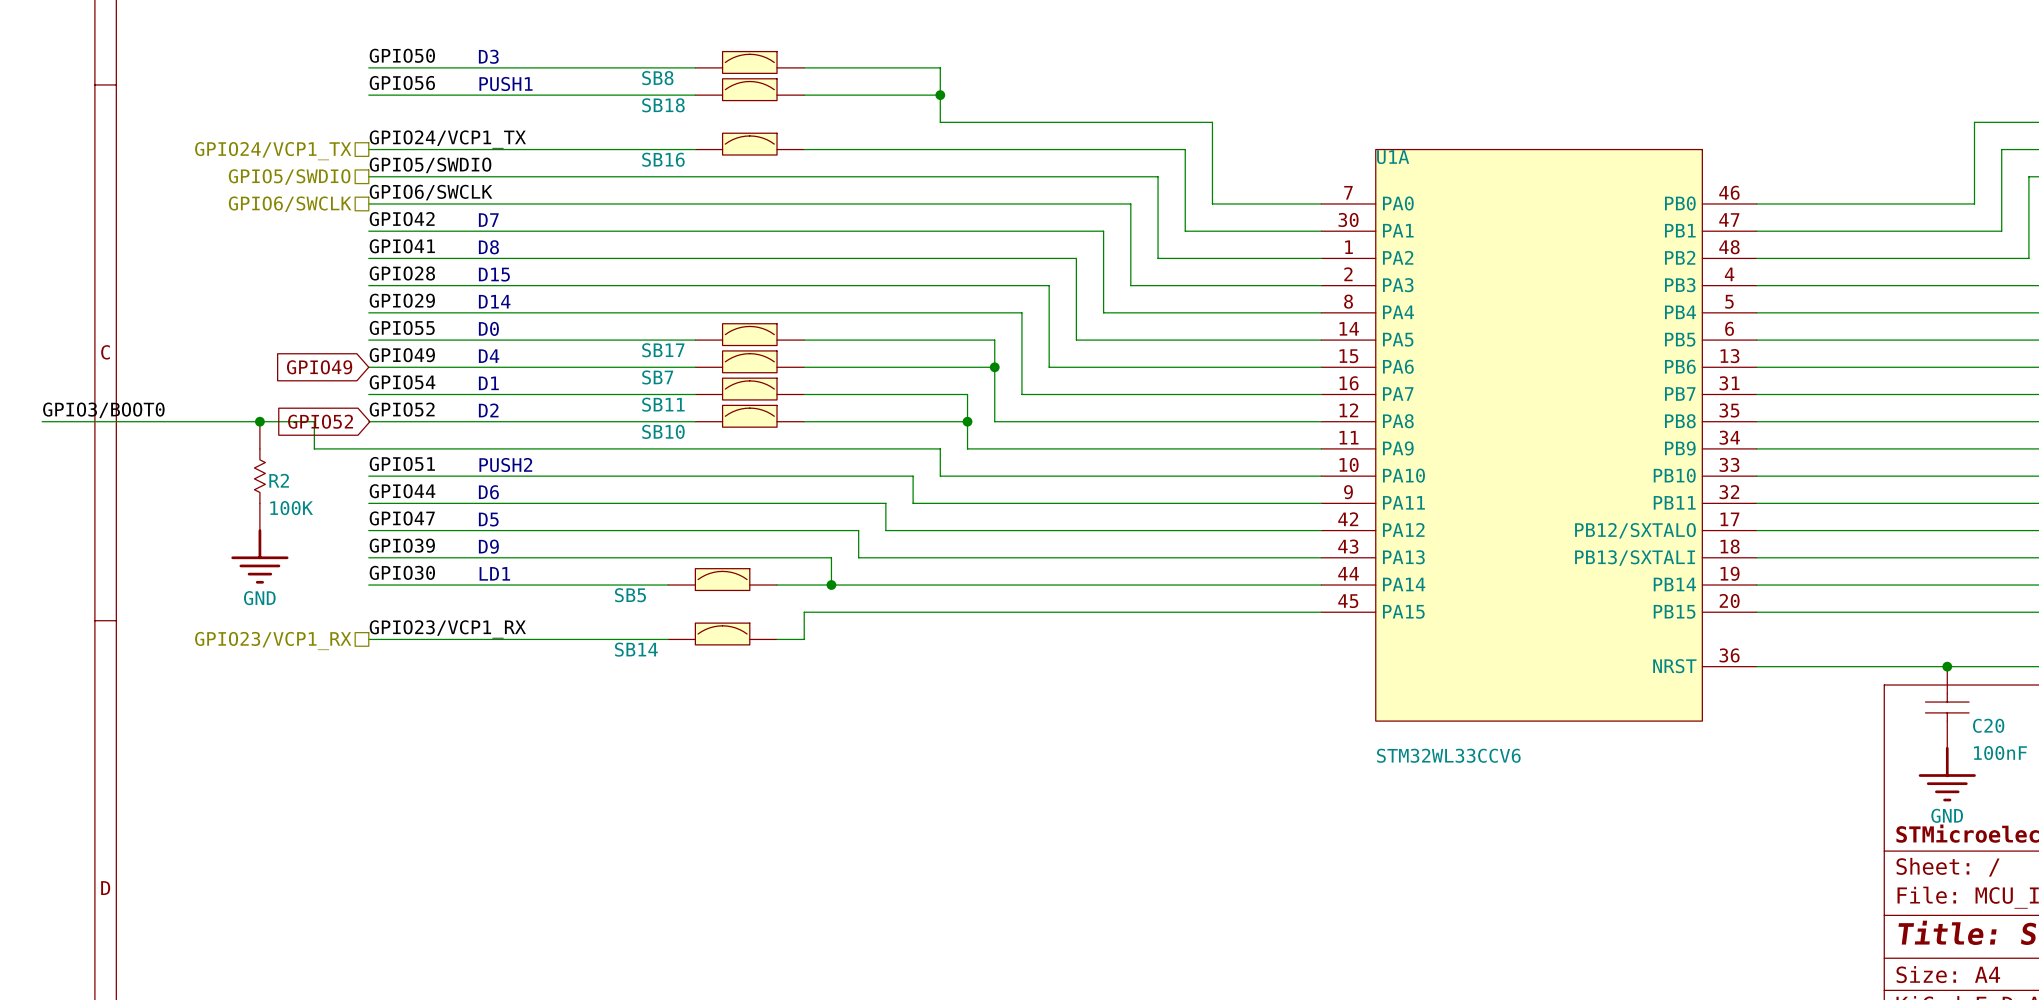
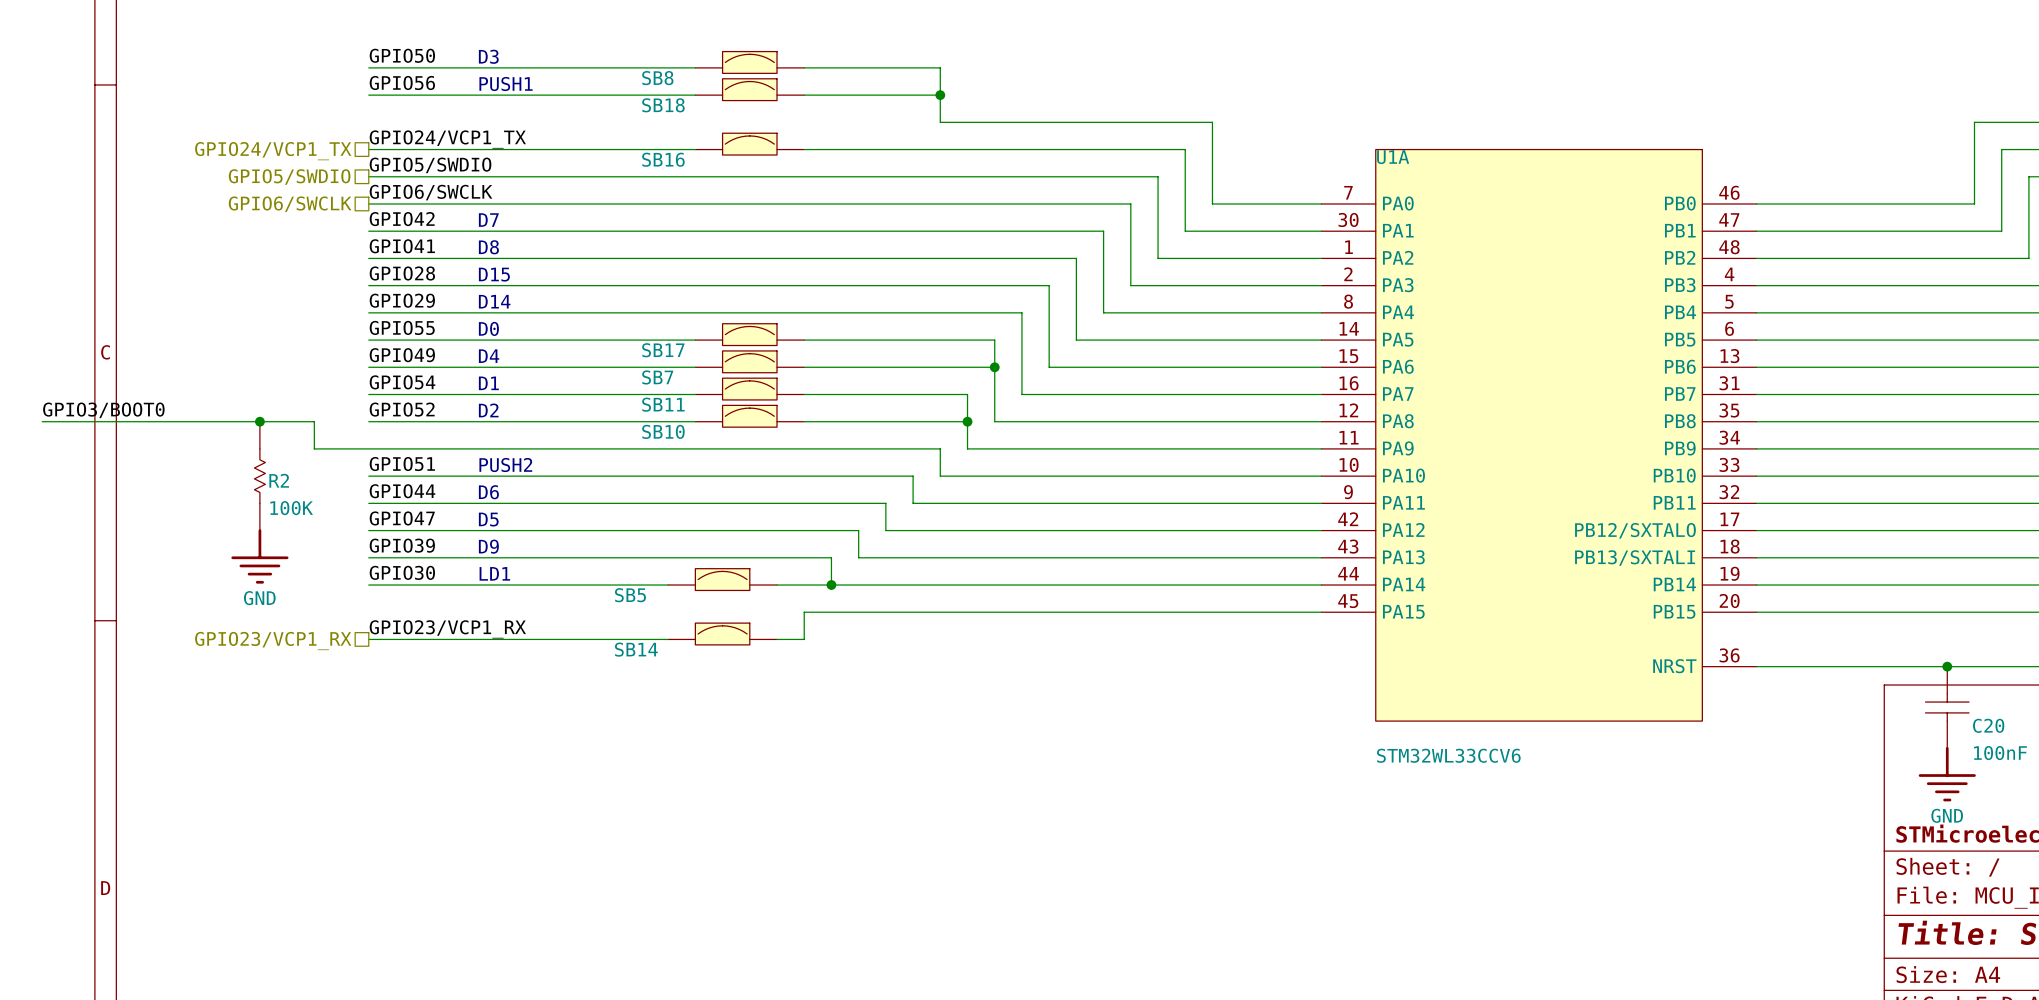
global label: GPIO49 (319, 367) -> none
global label: GPIO52 (320, 421) -> none

